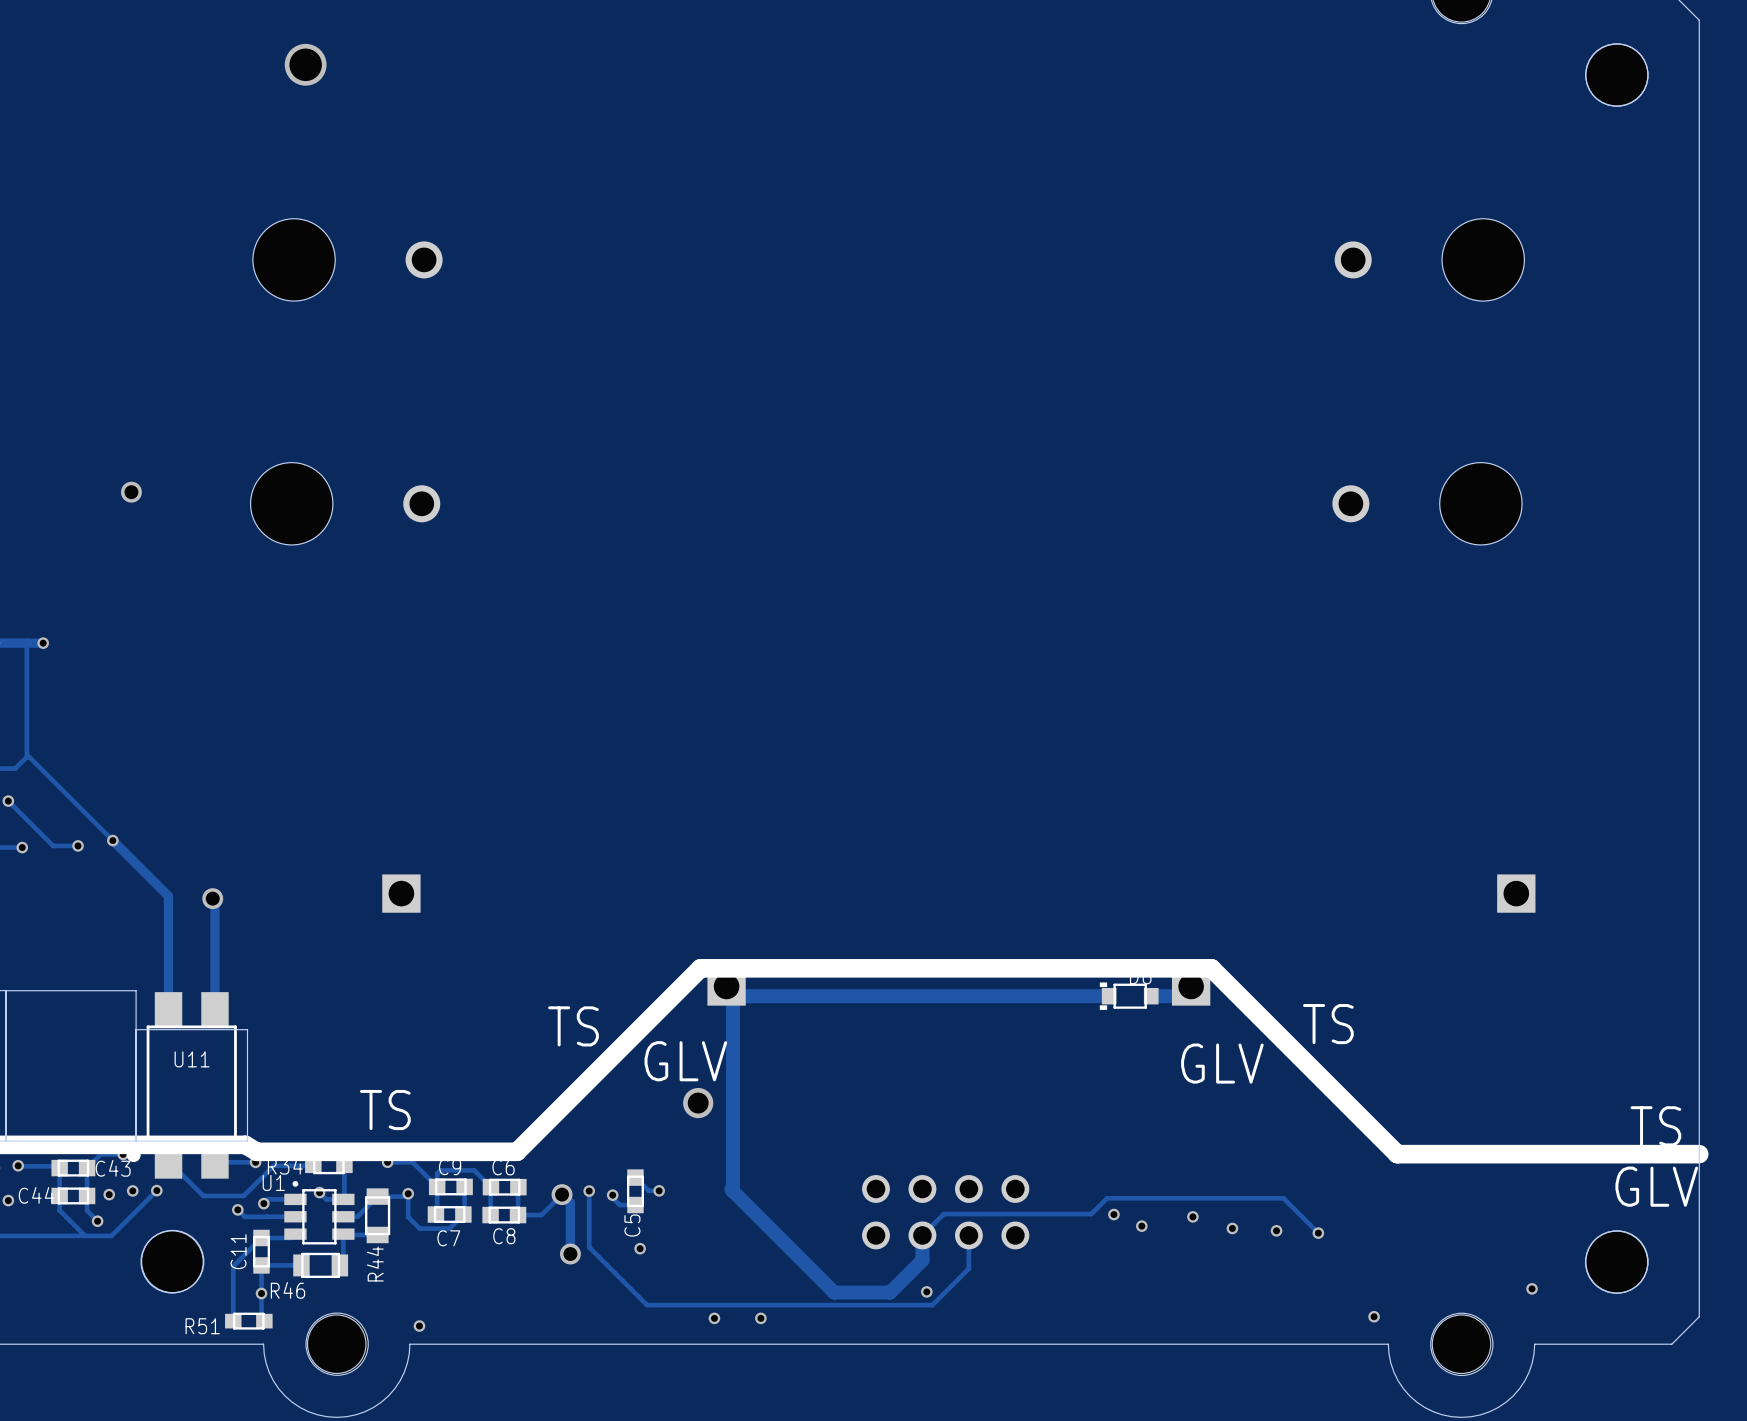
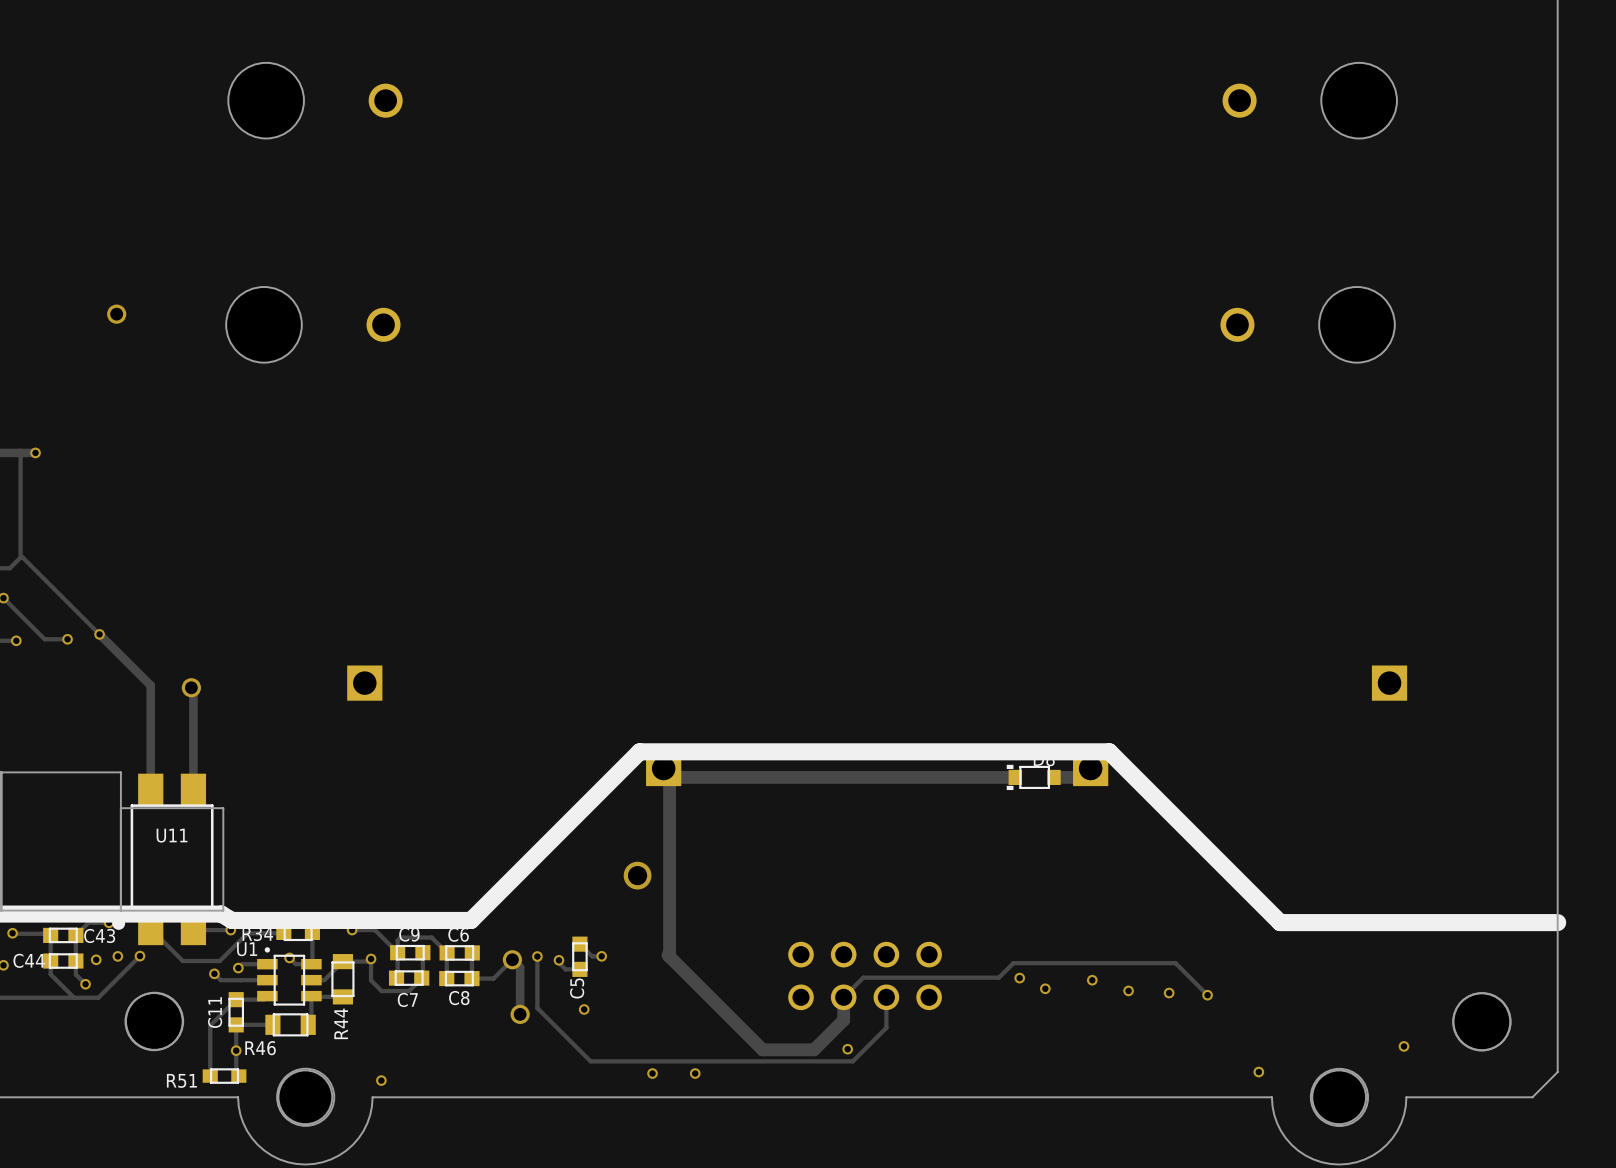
drawing: [1181, 1004, 1354, 1084] -> none
drawing: [548, 1006, 728, 1082] -> none
drawing: [359, 1089, 411, 1131] -> none
drawing: [1615, 1106, 1699, 1207] -> none

